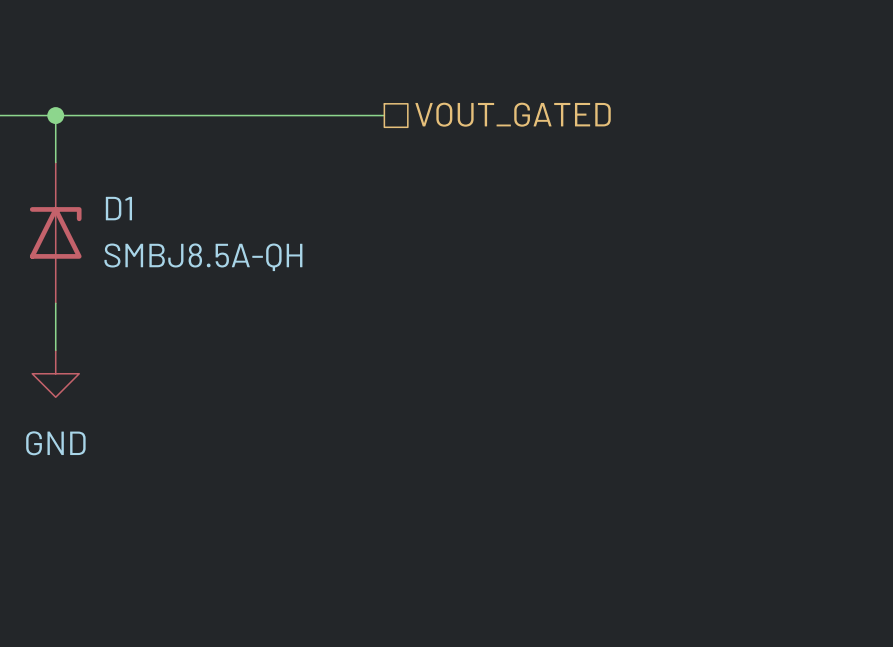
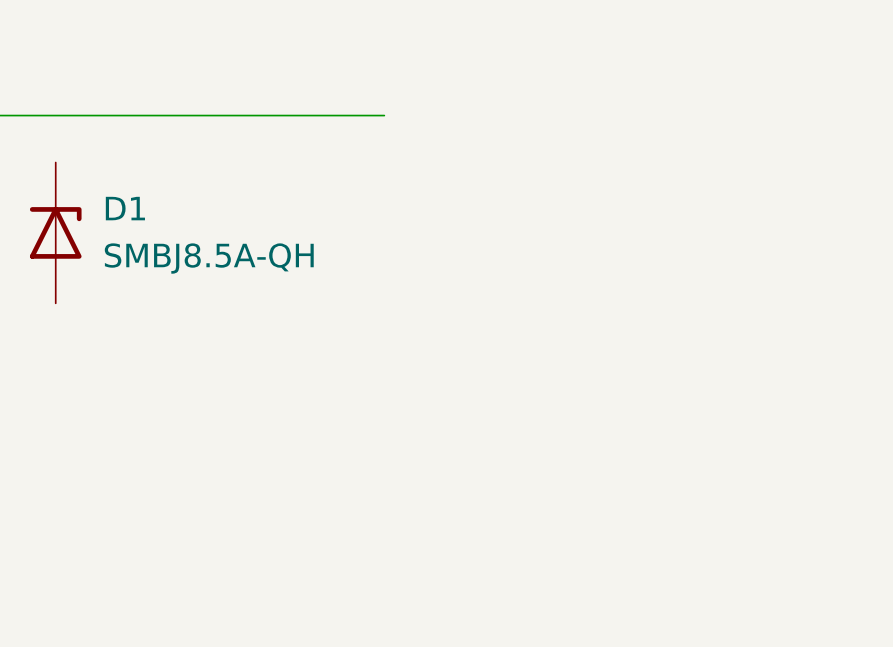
hierarchical label: VOUT_GATED (513, 114) -> none
wire: (55, 115) (55, 162) -> none
junction: (55, 115) -> none
wire: (55, 303) (55, 350) -> none
power symbol: GND (55, 373) -> none

